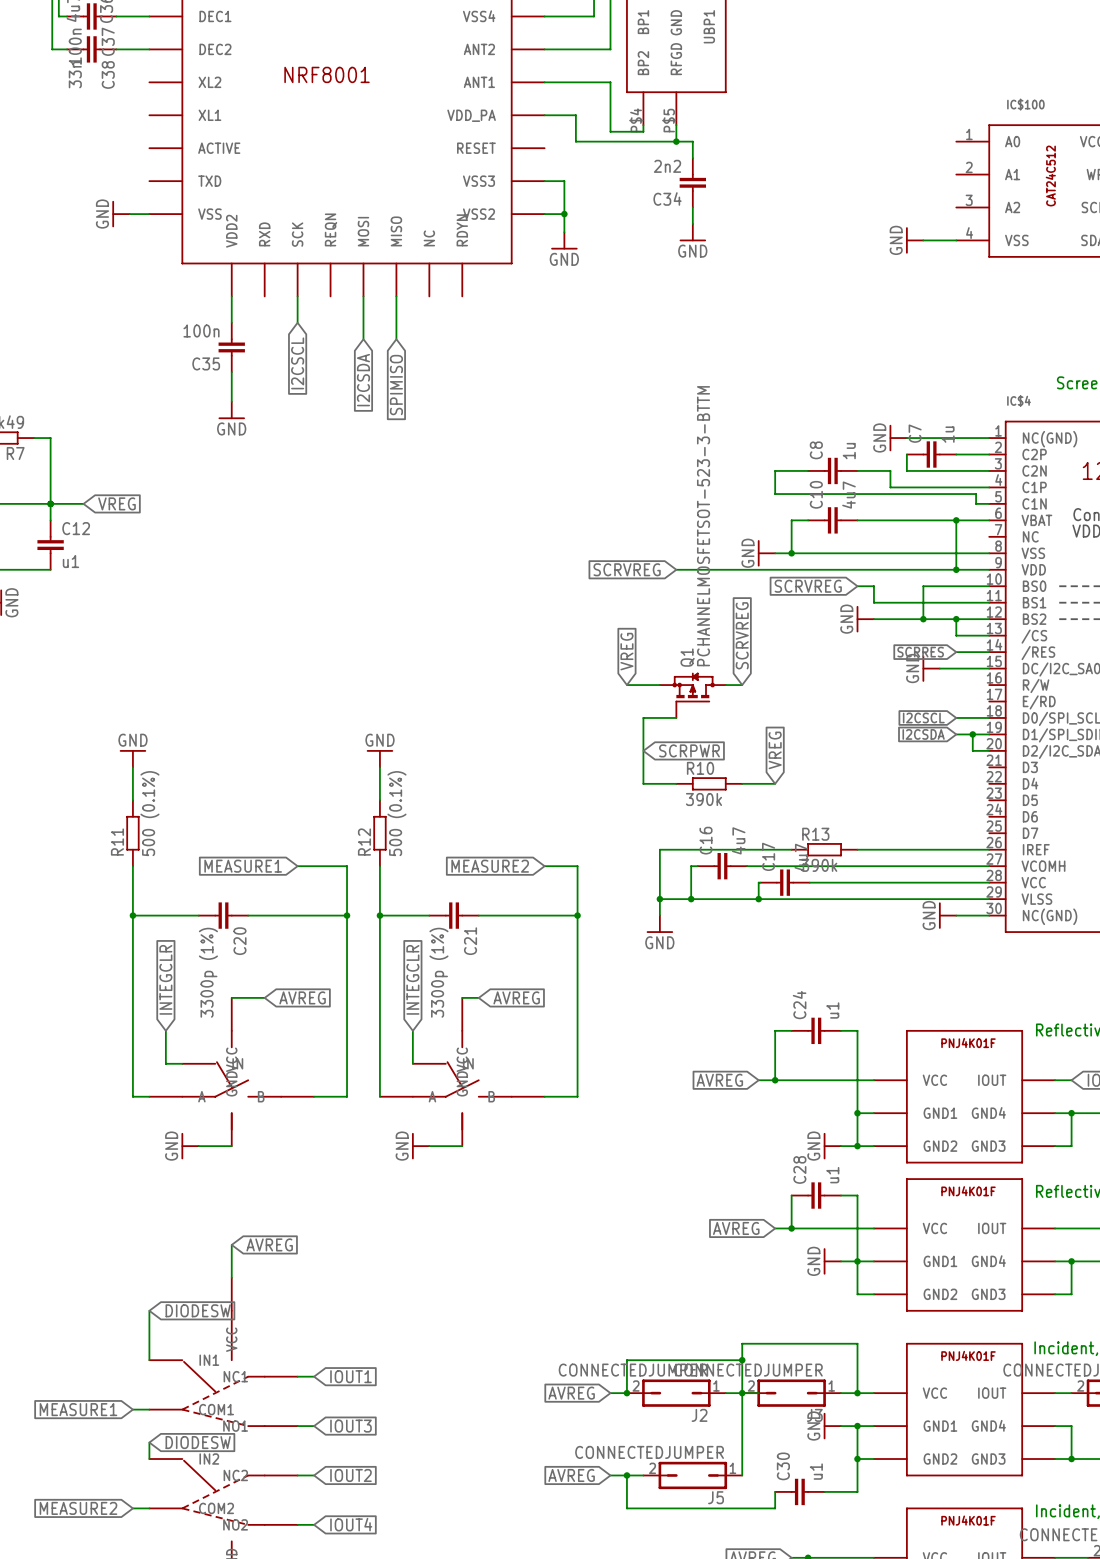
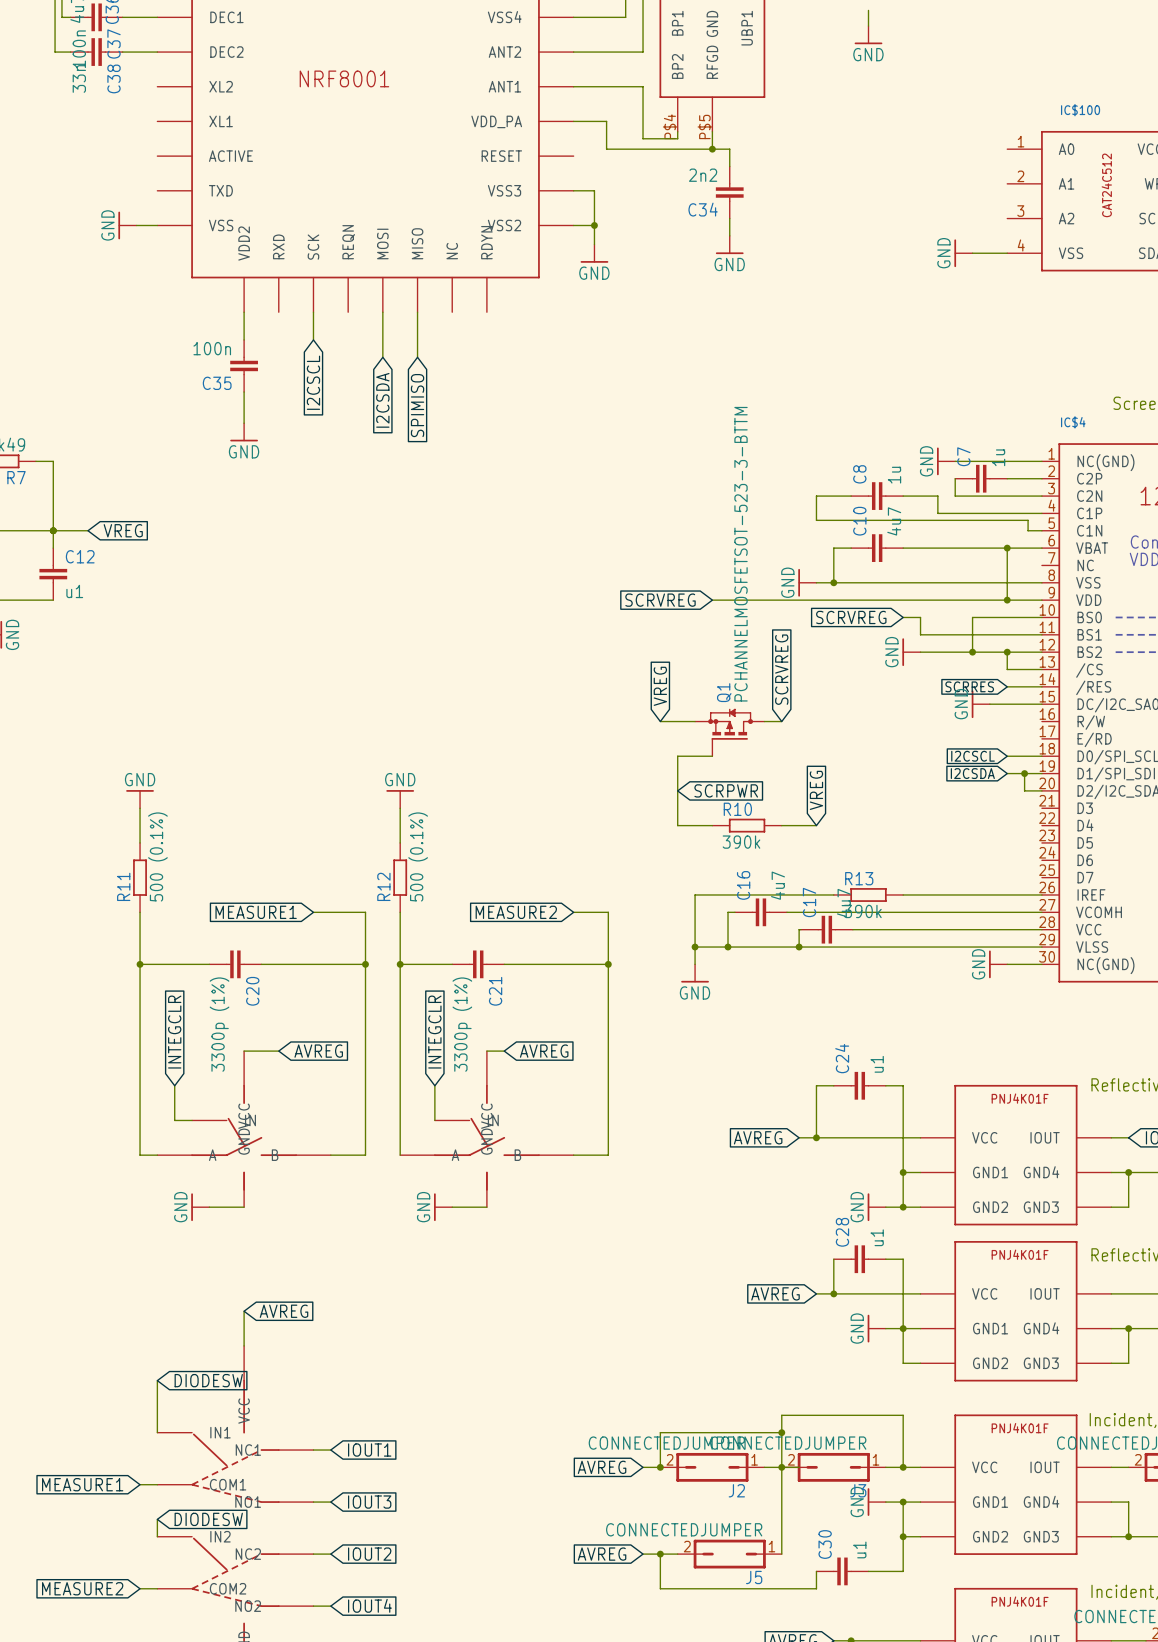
wire: none -> (868, 10) (868, 26)
power symbol: none -> GND (868, 35)

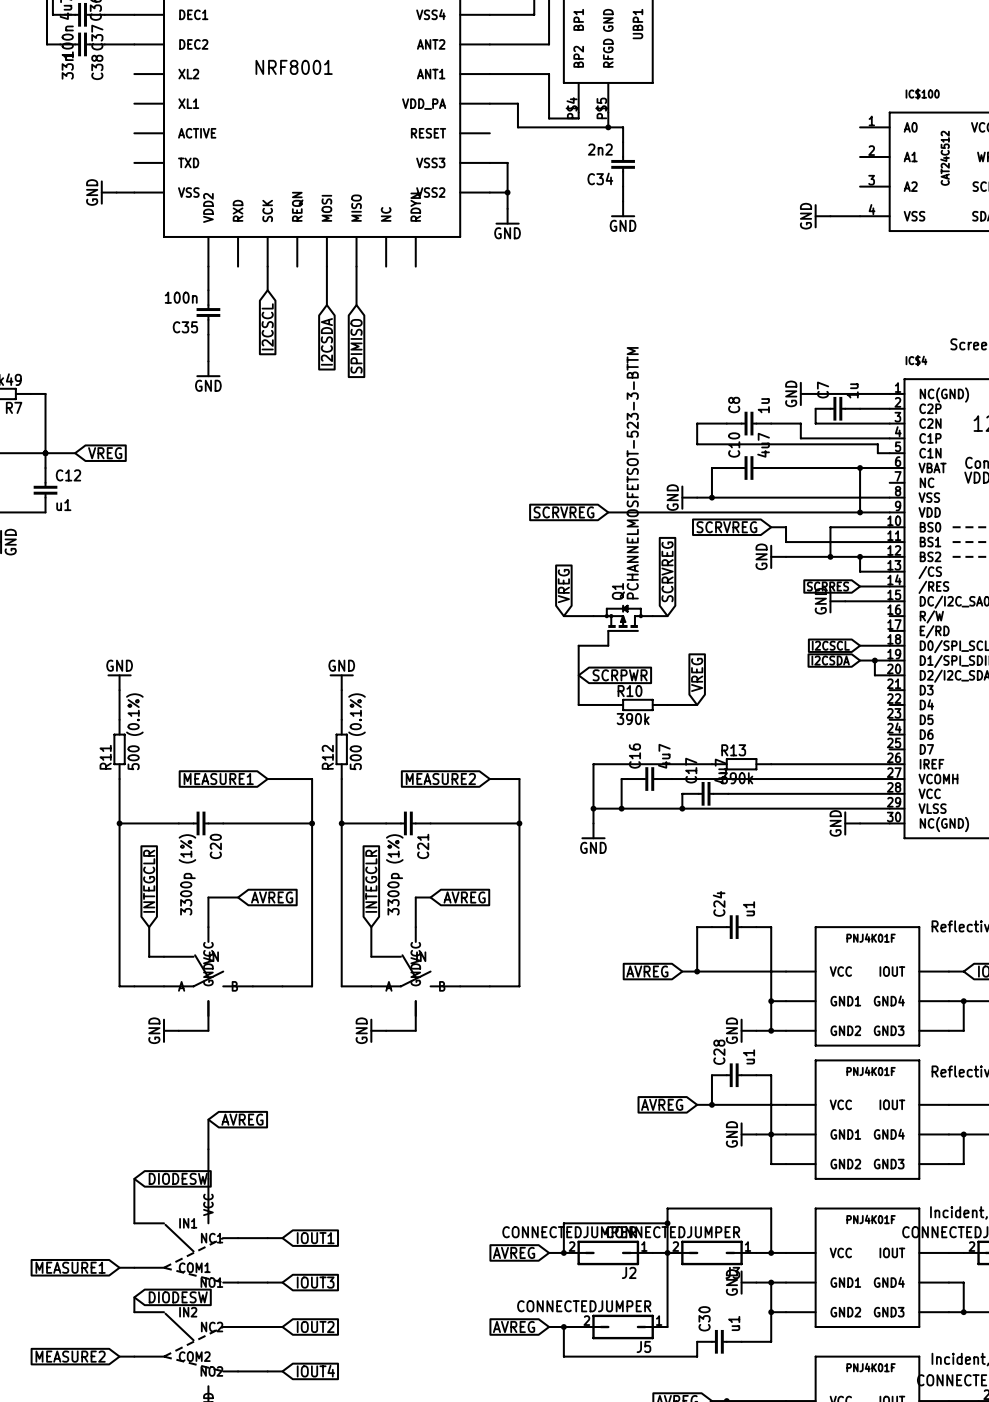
wire: (868, 10) (868, 26) -> none
power symbol: GND (868, 35) -> none

